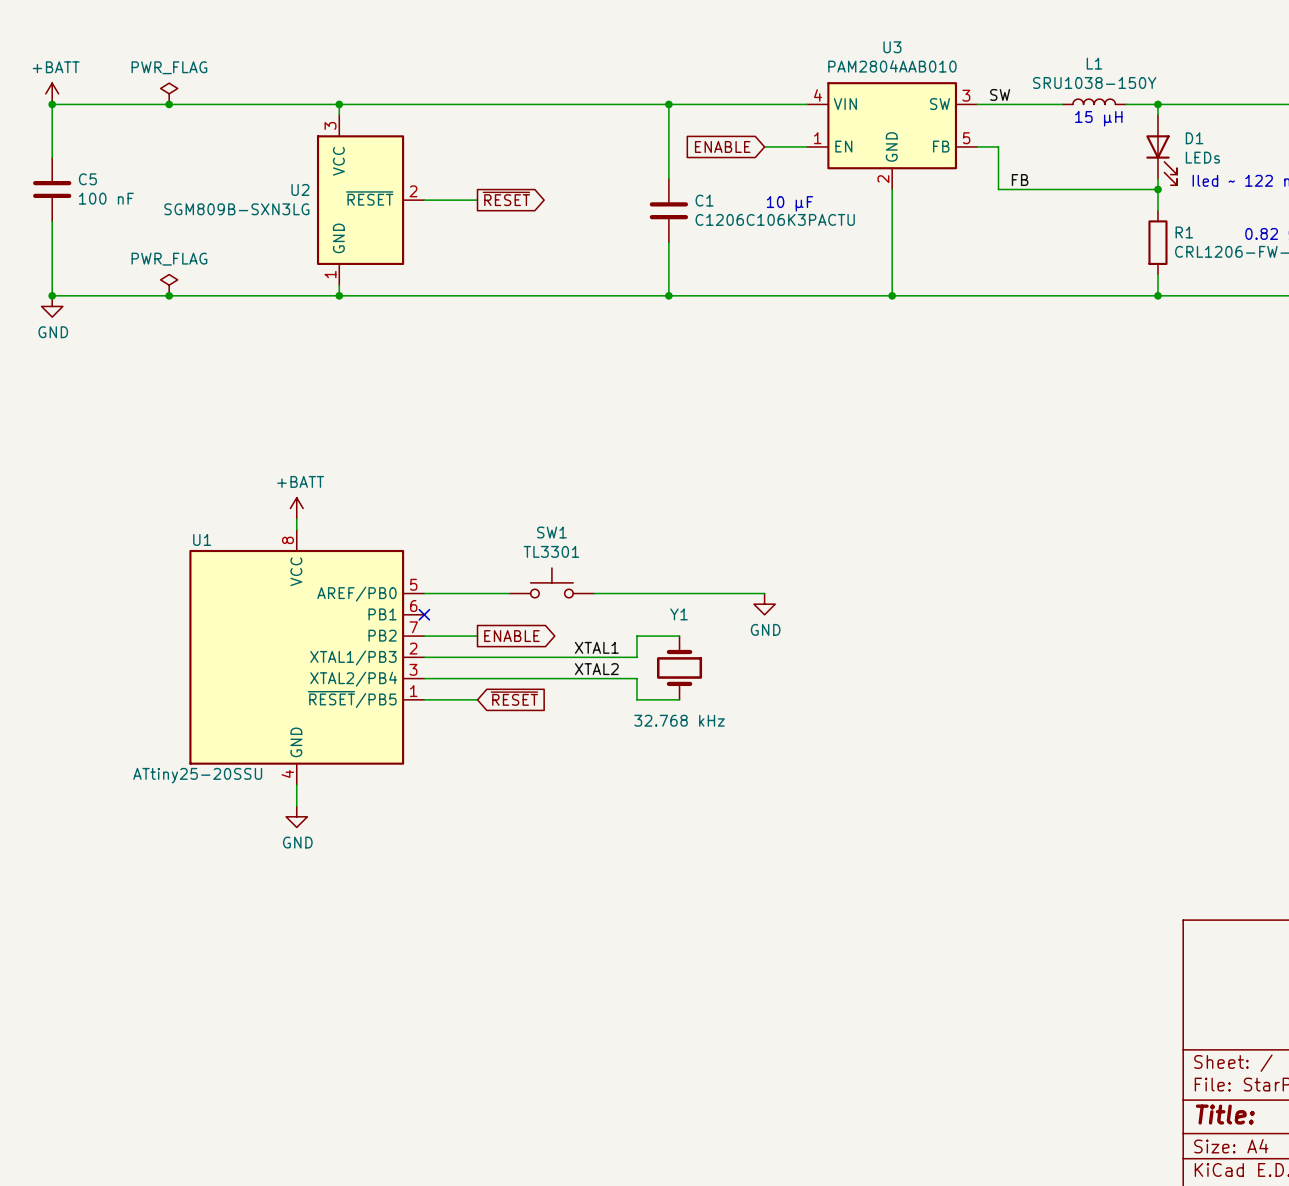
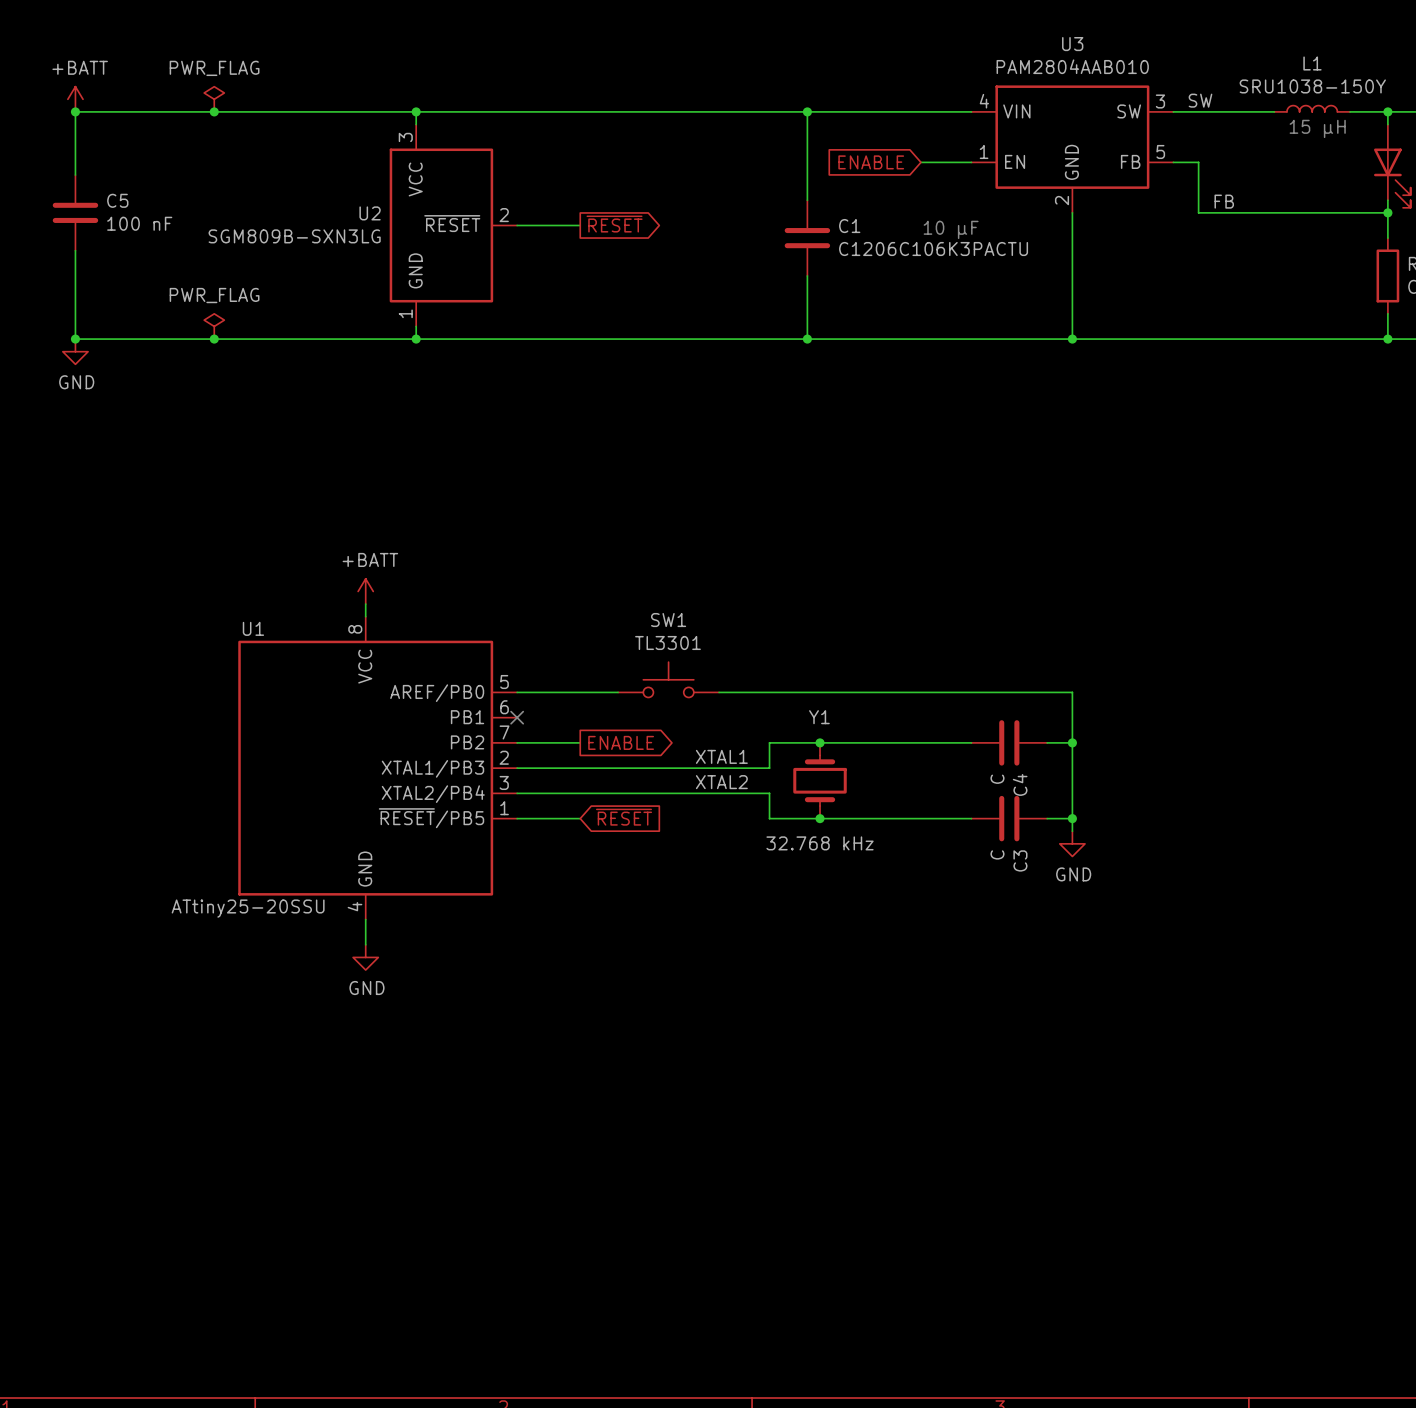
wire: none -> (920, 692) (1072, 692) (1072, 831)
power symbol position: GND (764, 604) -> GND (1072, 843)
wire: none -> (820, 742) (971, 742)
junction: none -> (820, 742)
C4: none -> C (1009, 742)
wire: none -> (1047, 742) (1072, 742)
junction: none -> (1072, 742)
wire: none -> (820, 818) (971, 818)
junction: none -> (820, 818)
C3: none -> C (1009, 818)
wire: none -> (1047, 818) (1072, 818)
junction: none -> (1072, 818)

